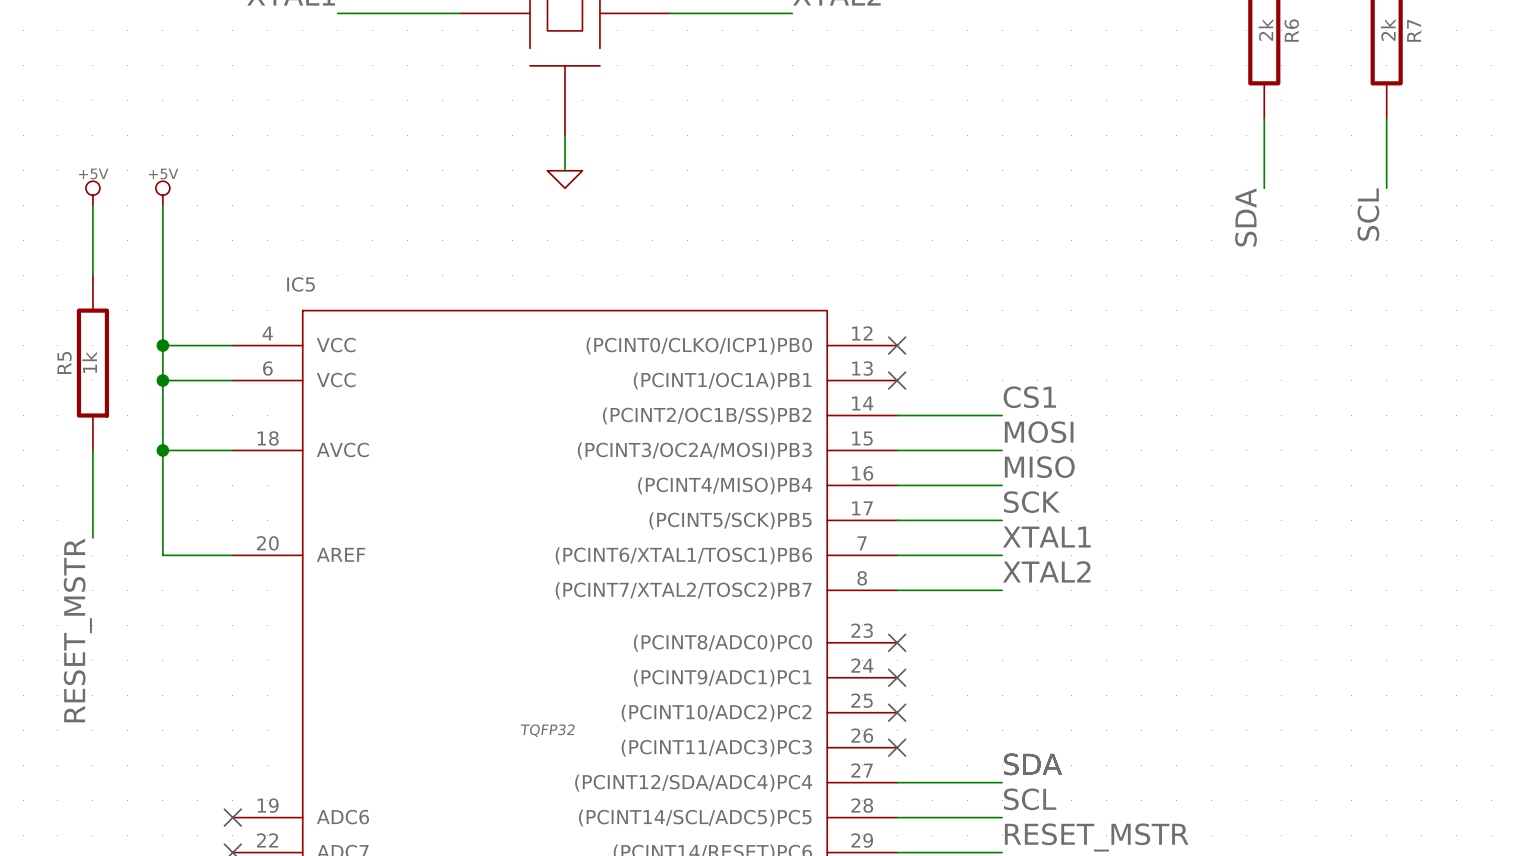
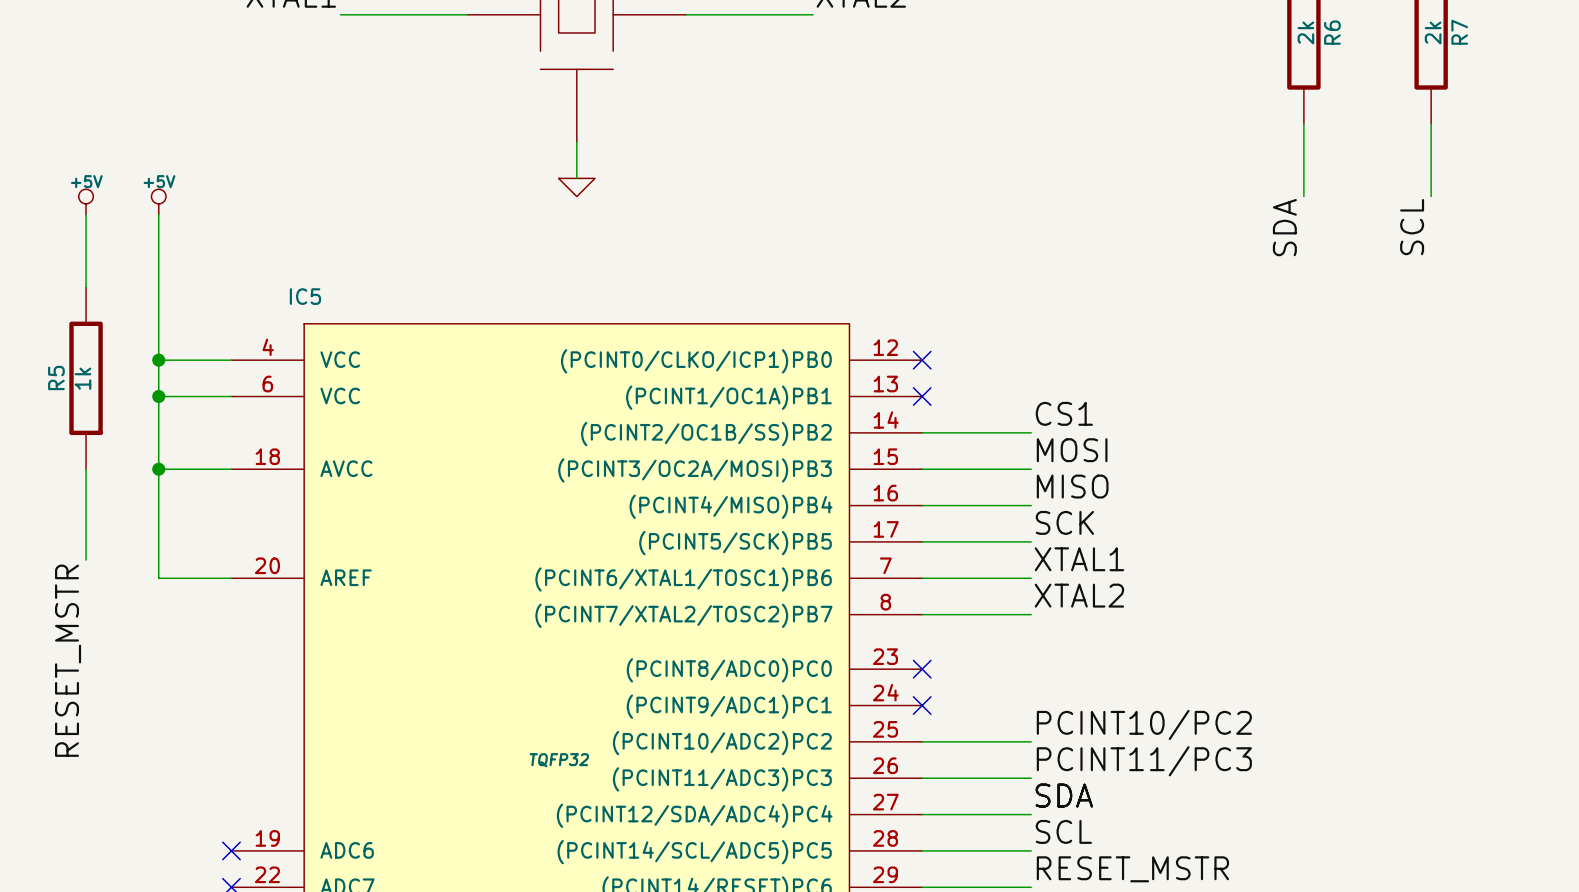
label: none -> PCINT10/PC2 (1144, 724)
wire: none -> (922, 741) (1031, 741)
no-connect mark: (897, 712) -> none
label: none -> PCINT11/PC3 (1144, 761)
wire: none -> (922, 778) (1031, 778)
no-connect mark: (897, 747) -> none

